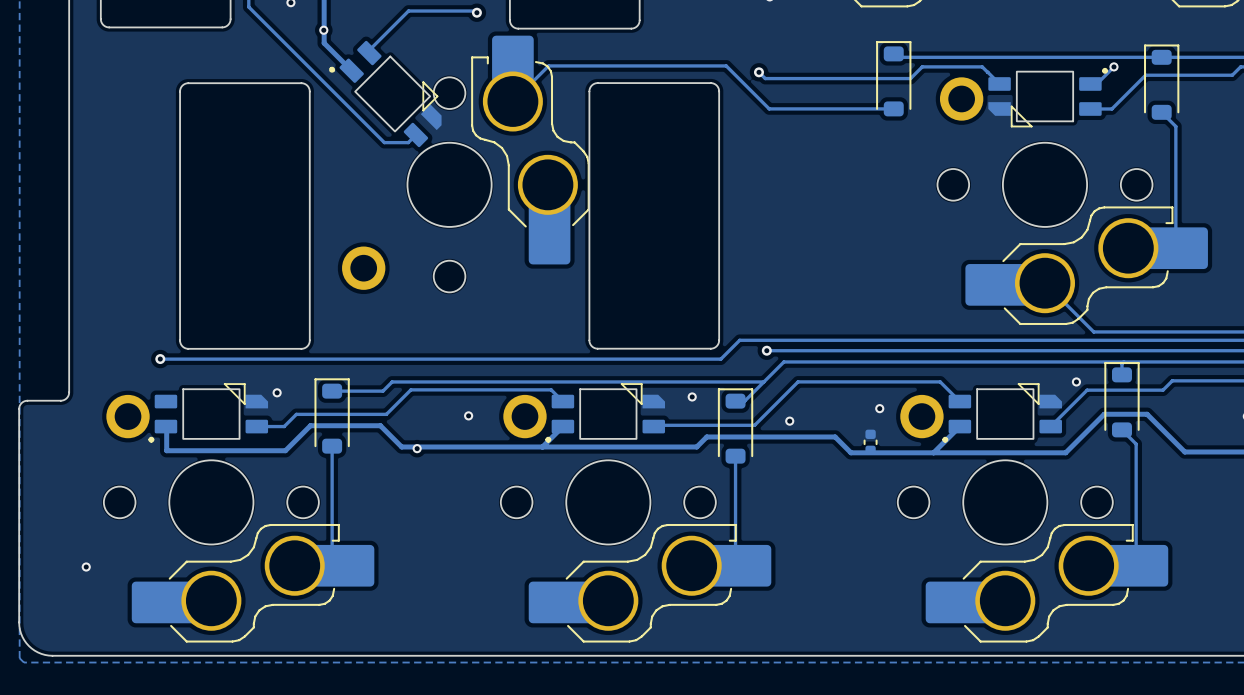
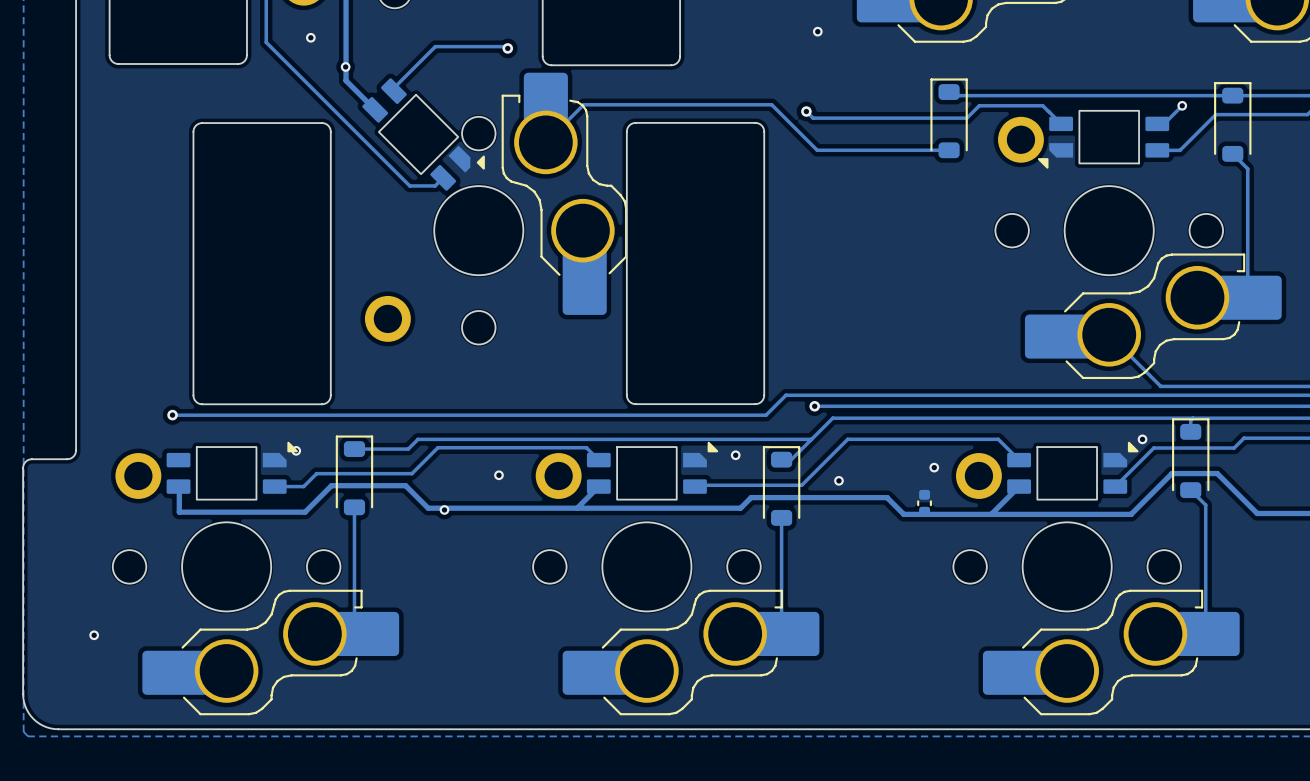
part footprint: [329, 40, 442, 148] -> [362, 78, 485, 191]
part footprint: [988, 67, 1108, 128] -> [1037, 110, 1170, 169]
part footprint: [148, 383, 269, 443] -> [166, 441, 298, 501]
part footprint: [545, 383, 666, 443] -> [586, 441, 719, 501]
part footprint: [942, 383, 1062, 443] -> [1007, 441, 1139, 501]

